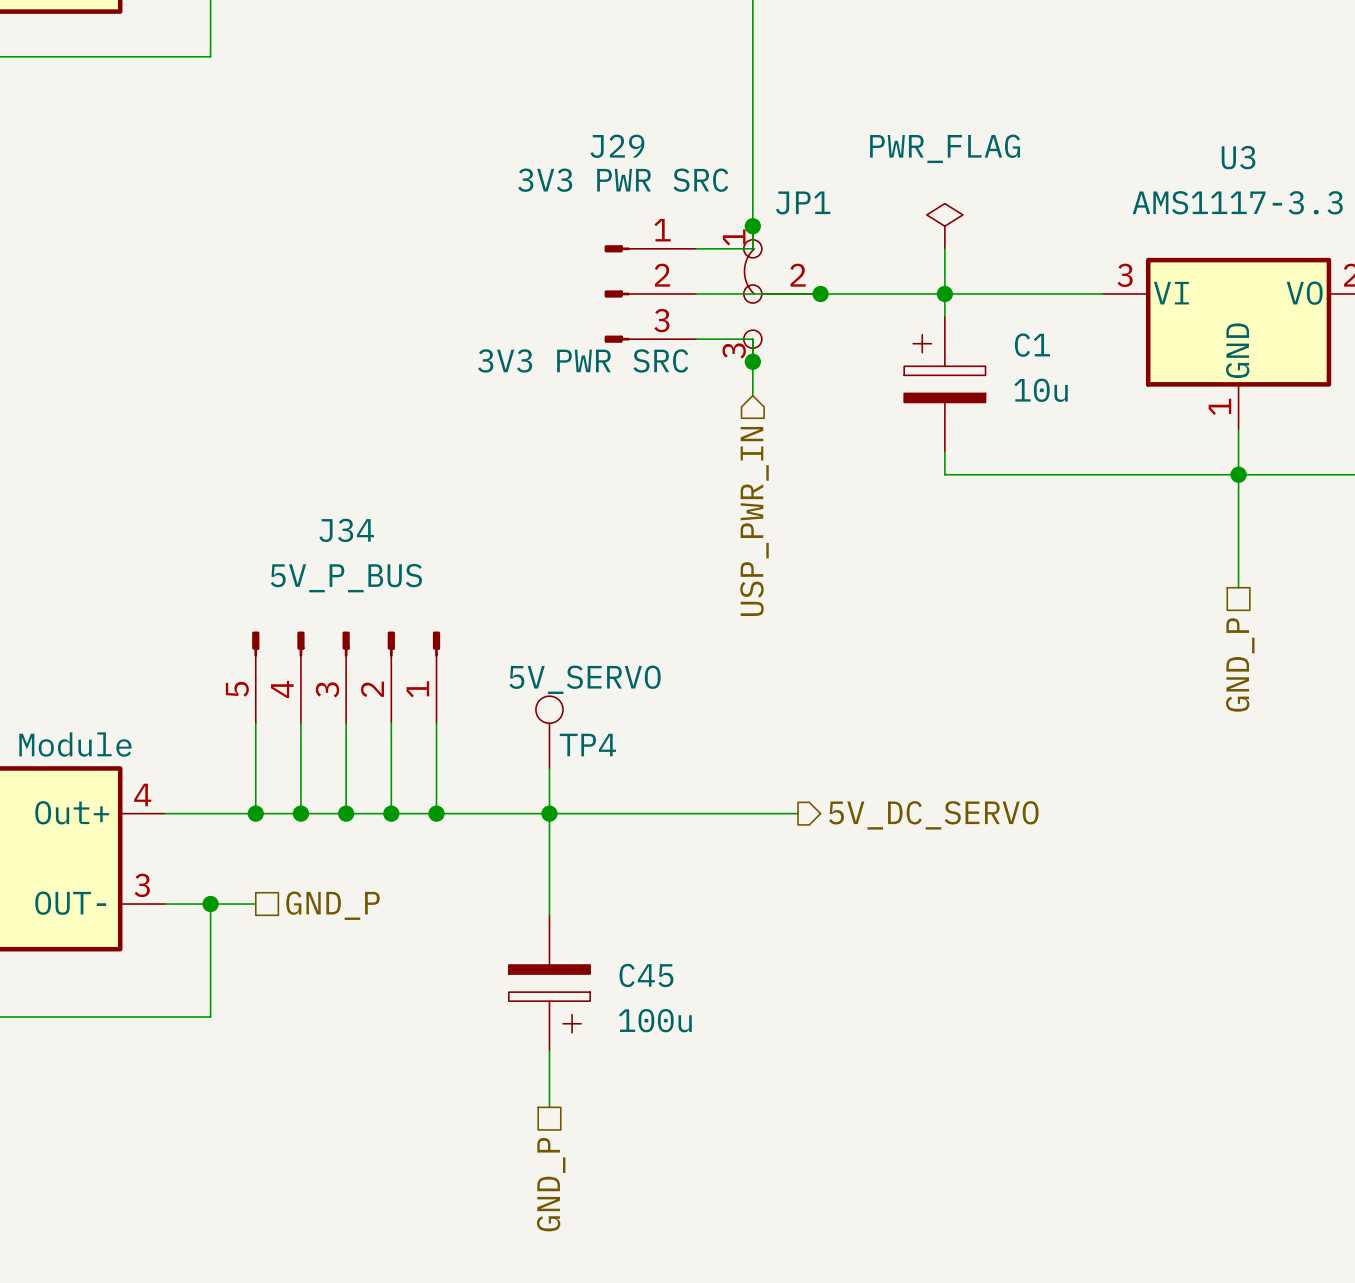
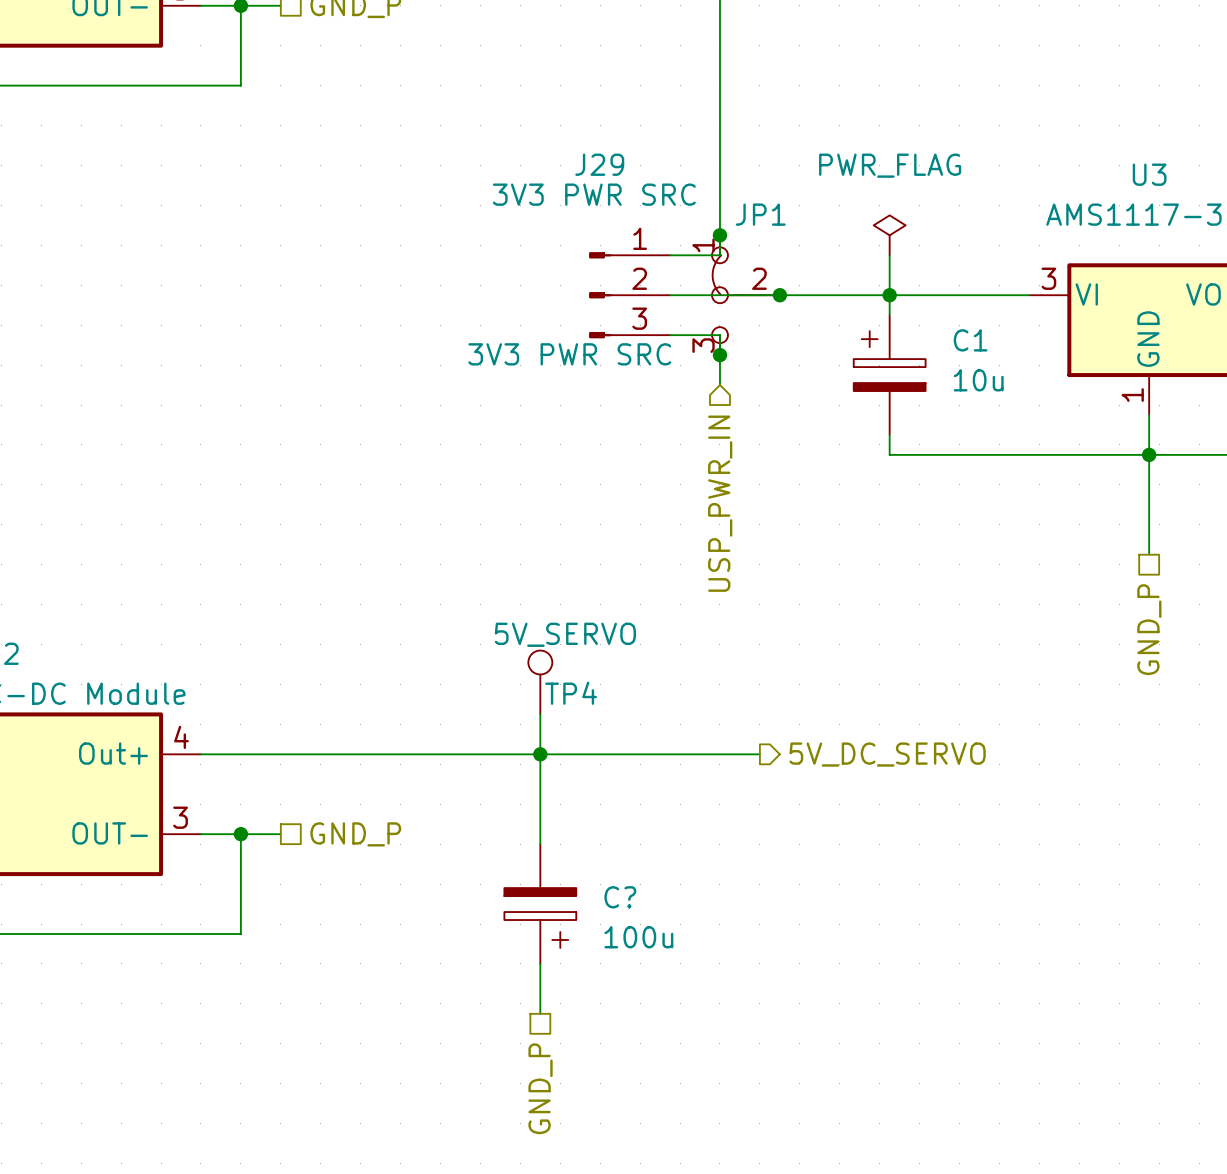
J34: 5V_P_BUS (346, 677) -> none
wire: (255, 723) (255, 813) -> none
wire: (300, 723) (300, 813) -> none
wire: (346, 723) (346, 813) -> none
wire: (391, 723) (391, 813) -> none
wire: (436, 723) (436, 813) -> none
junction: (255, 813) -> none
junction: (300, 813) -> none
junction: (346, 813) -> none
junction: (391, 813) -> none
junction: (436, 813) -> none
C45 name: C45 (646, 975) -> C? (620, 897)

